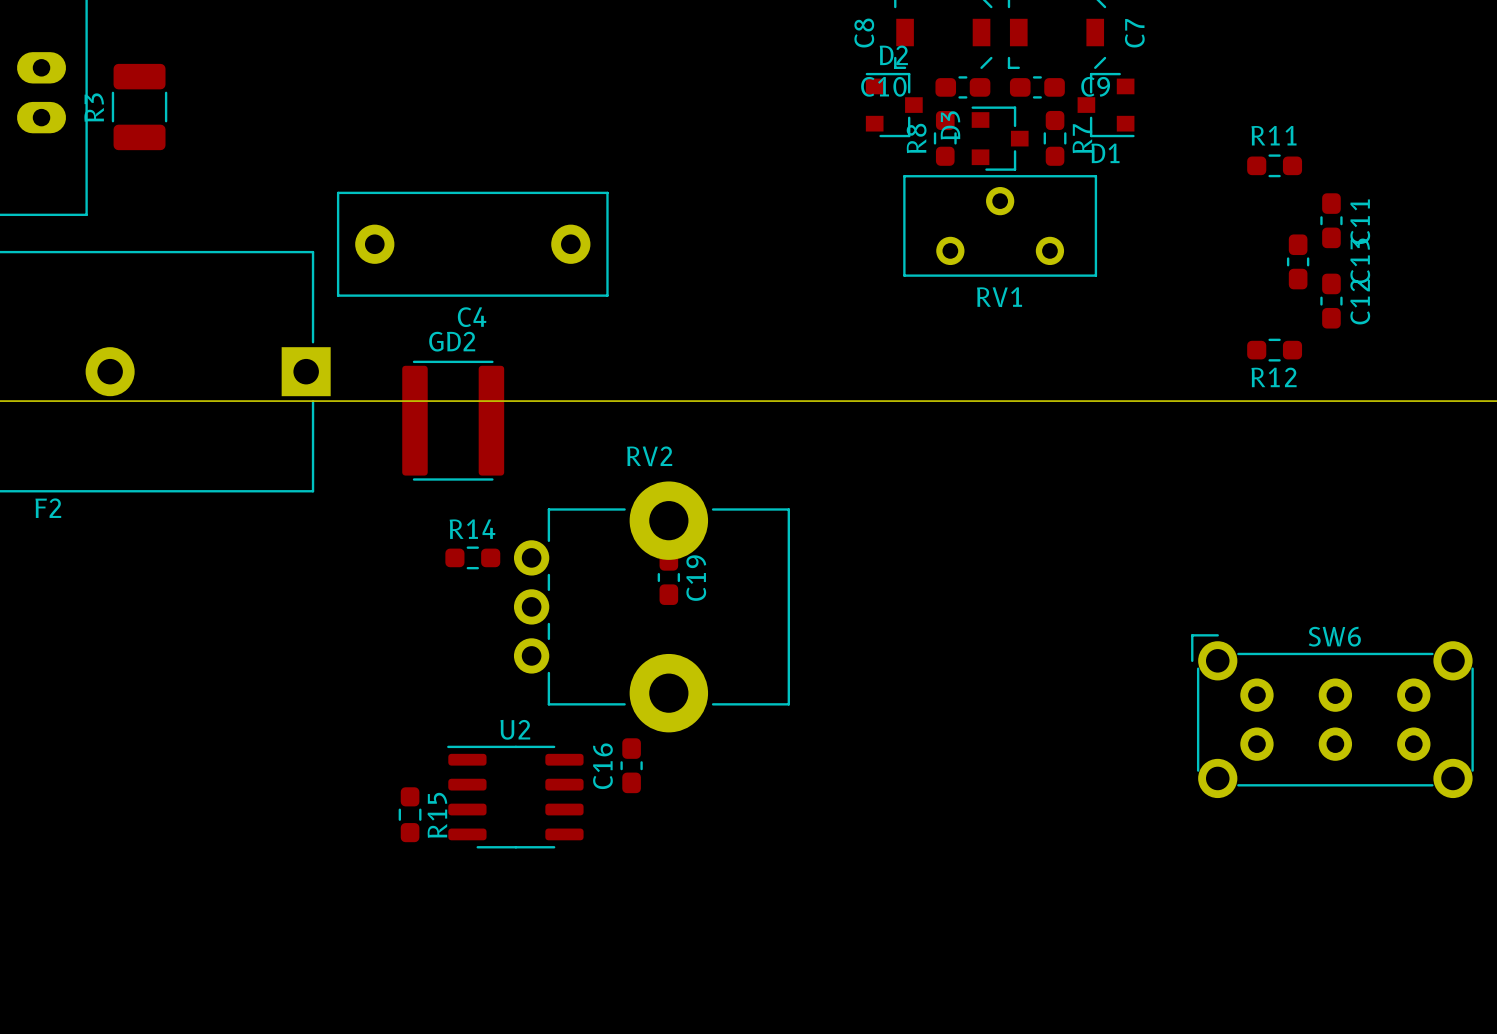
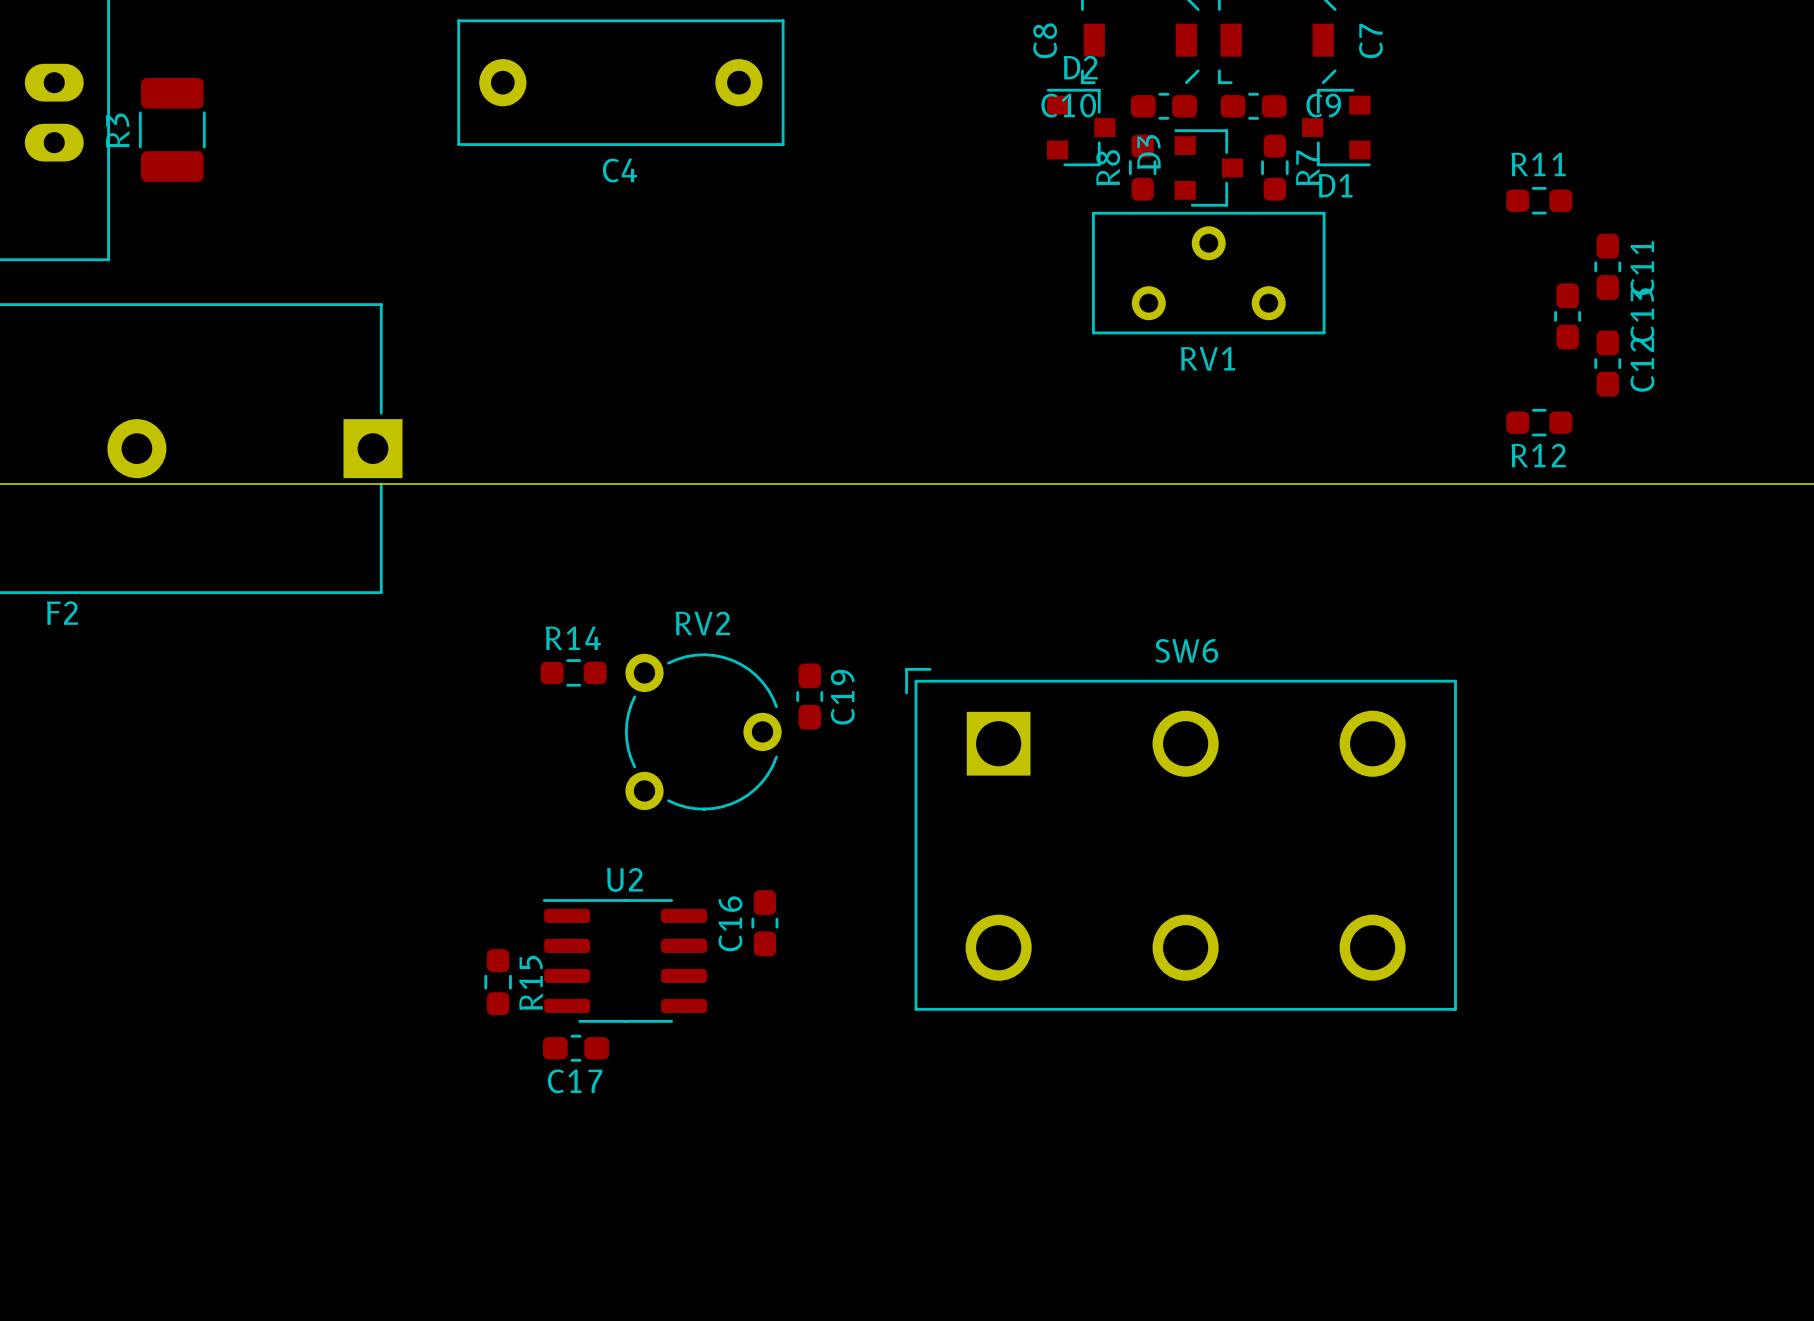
C4 position: (472, 244) -> (620, 82)
GD2: (453, 420) -> none
RV2 name position: RV2 (649, 456) -> RV2 (702, 623)
RV2 footprint: [513, 481, 790, 733] -> [624, 653, 782, 811]
SW6 footprint: [1191, 634, 1474, 799] -> [905, 667, 1457, 1011]
SW6 name position: SW6 (1334, 636) -> SW6 (1186, 650)
C17: none -> (576, 1048)

